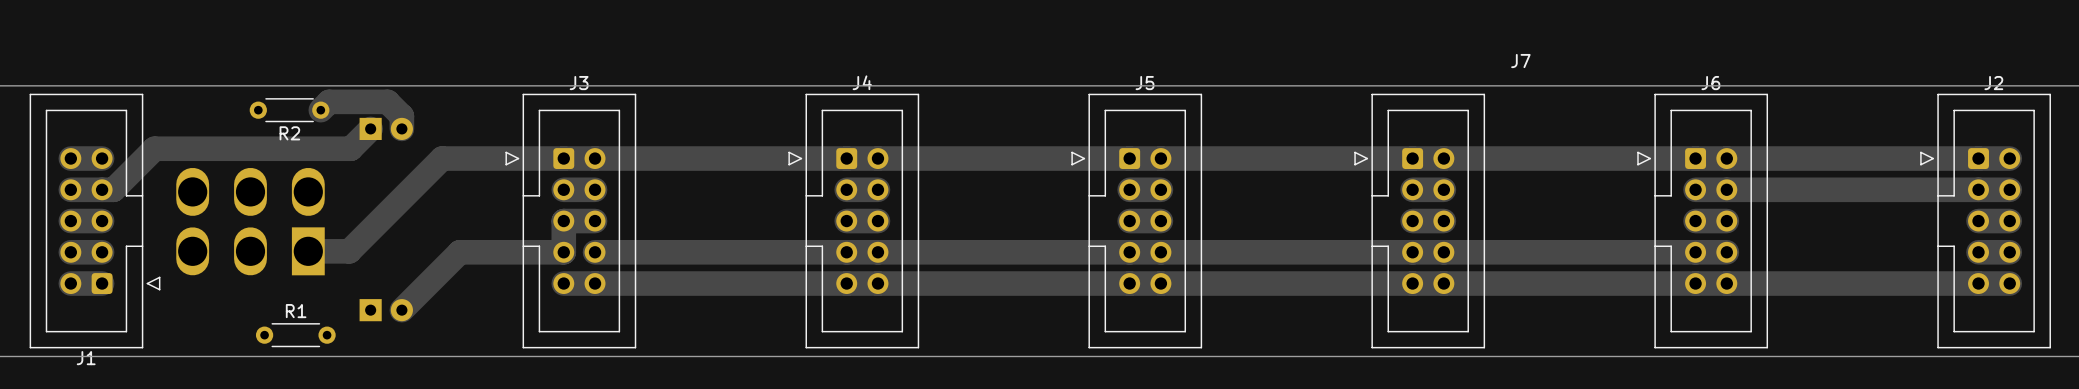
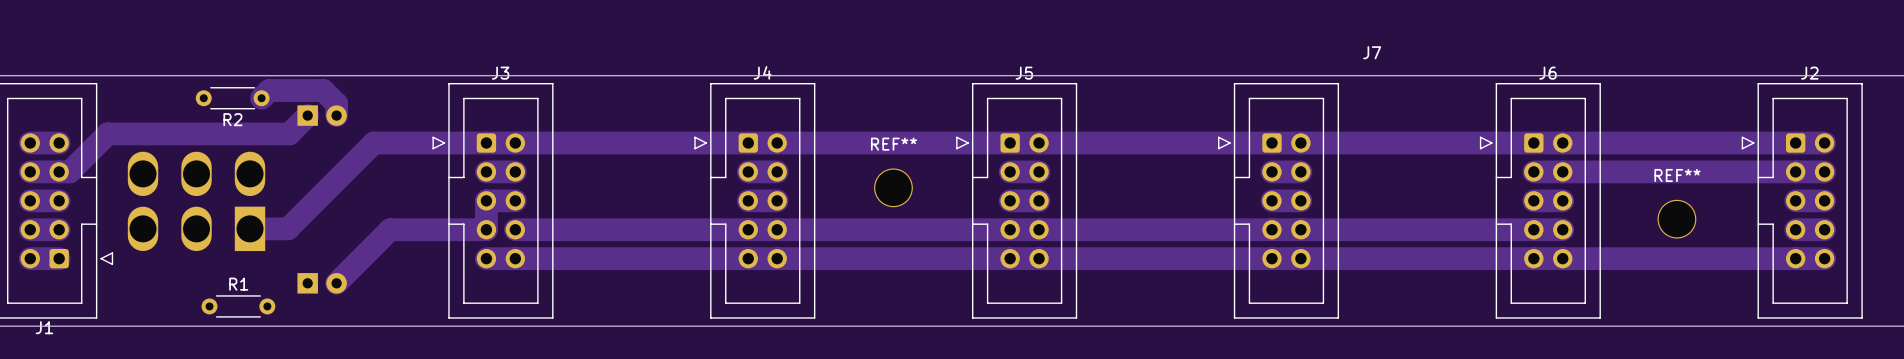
REF**: none -> (893, 187)
REF**: none -> (1676, 219)

